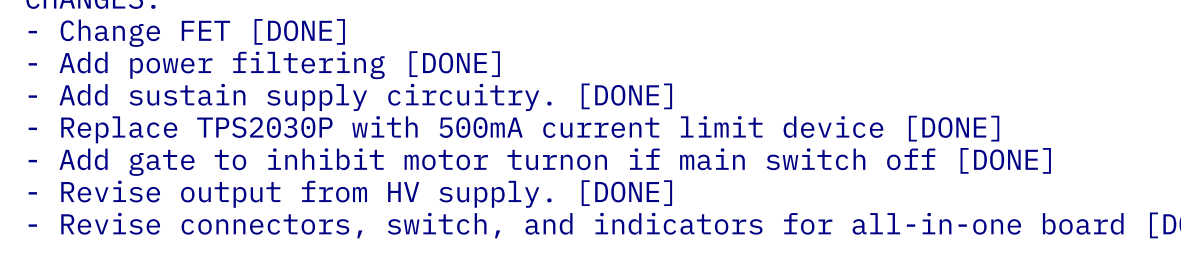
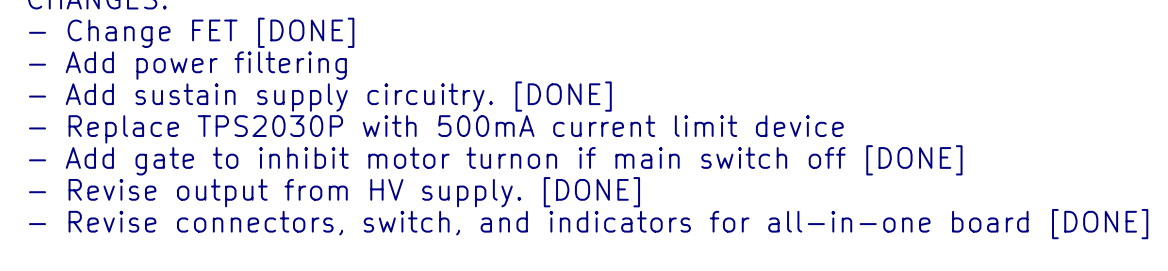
text: - Add power filtering [DONE] (264, 65) -> - Add power filtering (187, 65)
text: - Replace TPS2030P with 500mA current limit device [DONE] (513, 129) -> - Replace TPS2030P with 500mA current limit device (436, 129)

